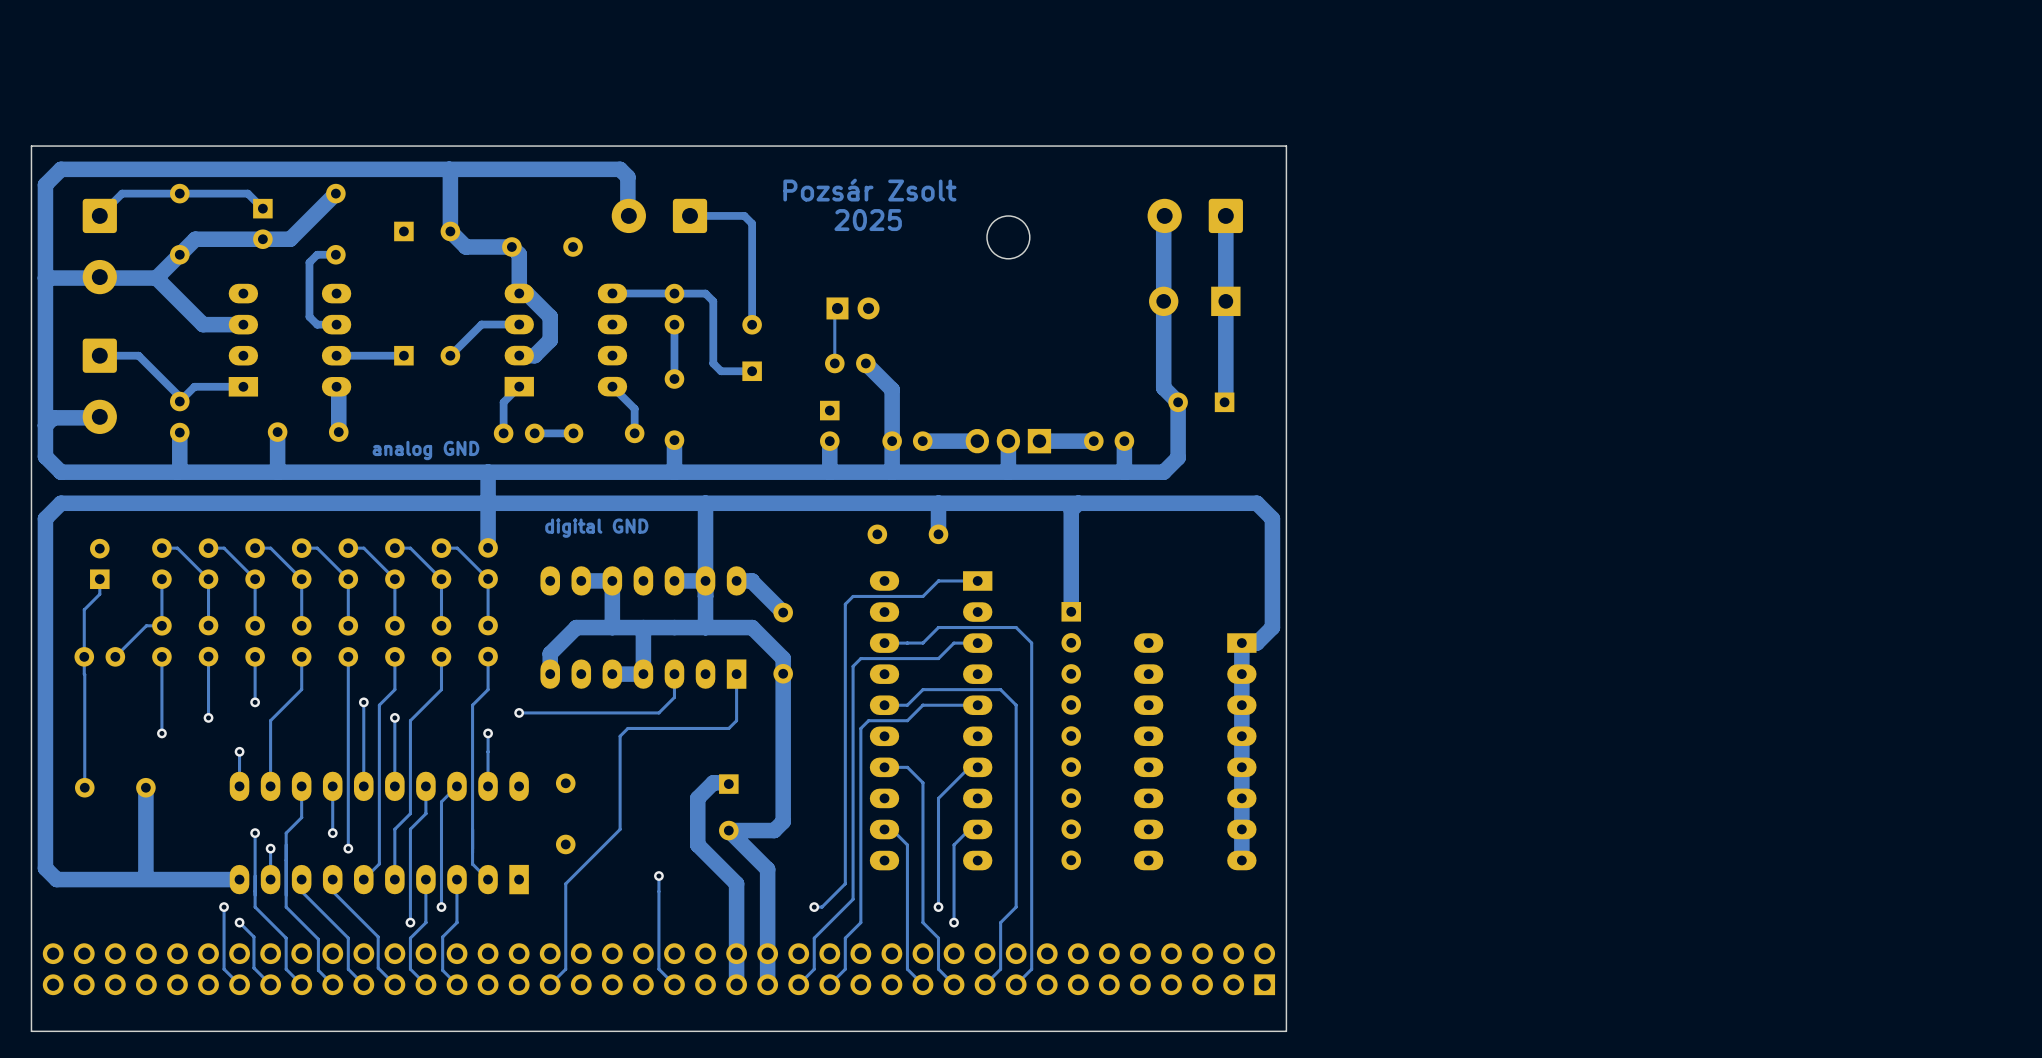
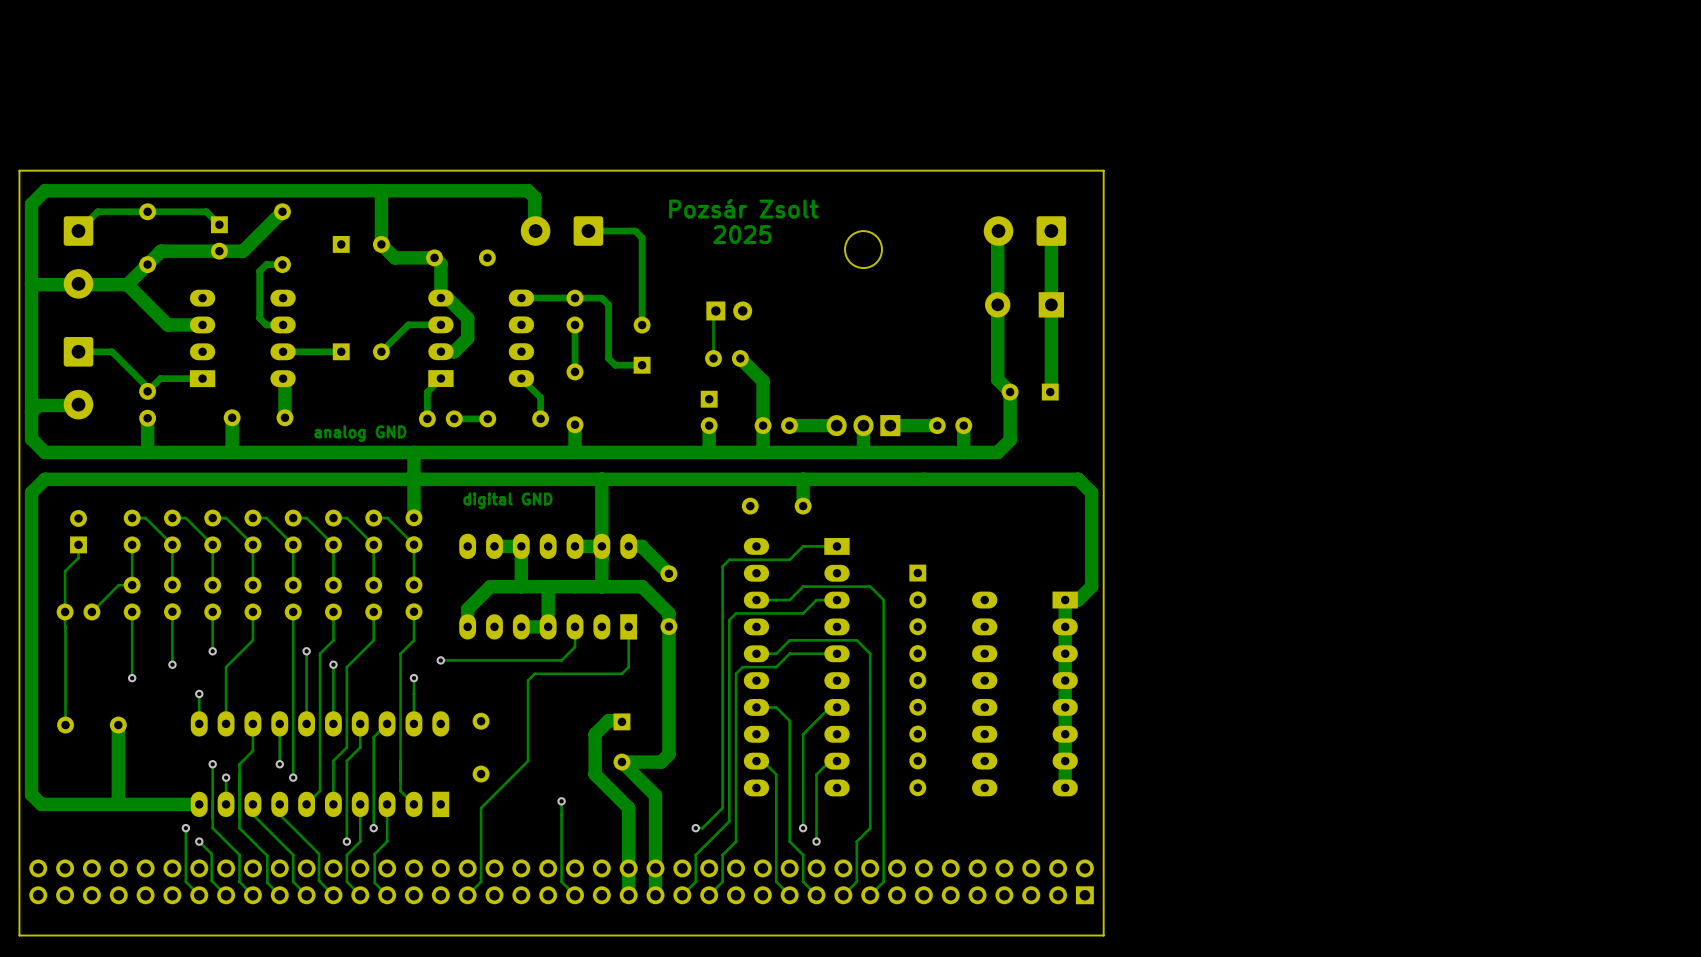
track: (1078, 503) (1071, 510) (1071, 611) -> none

